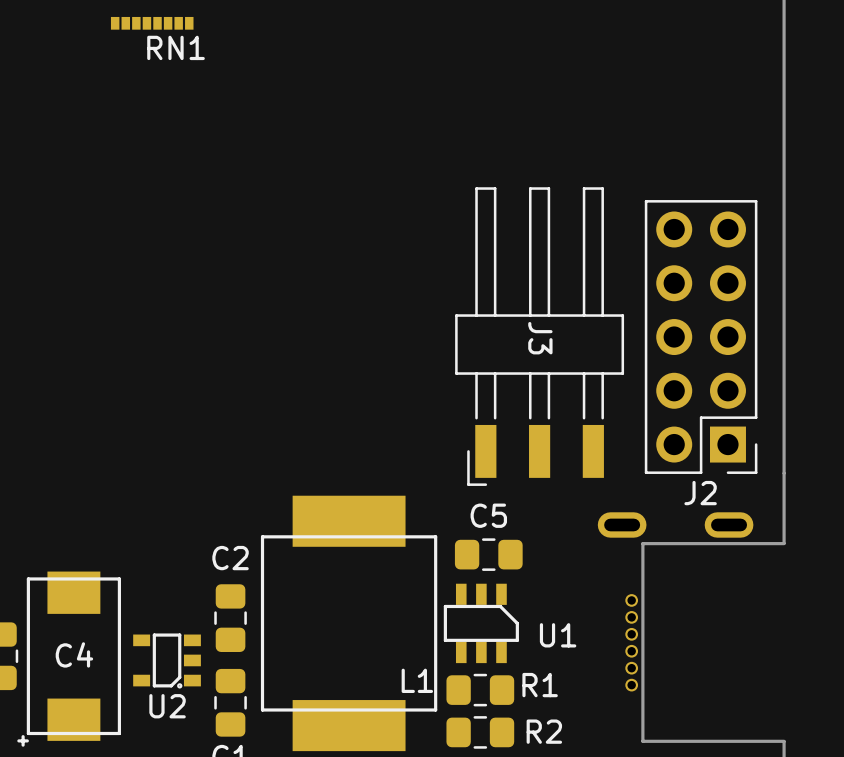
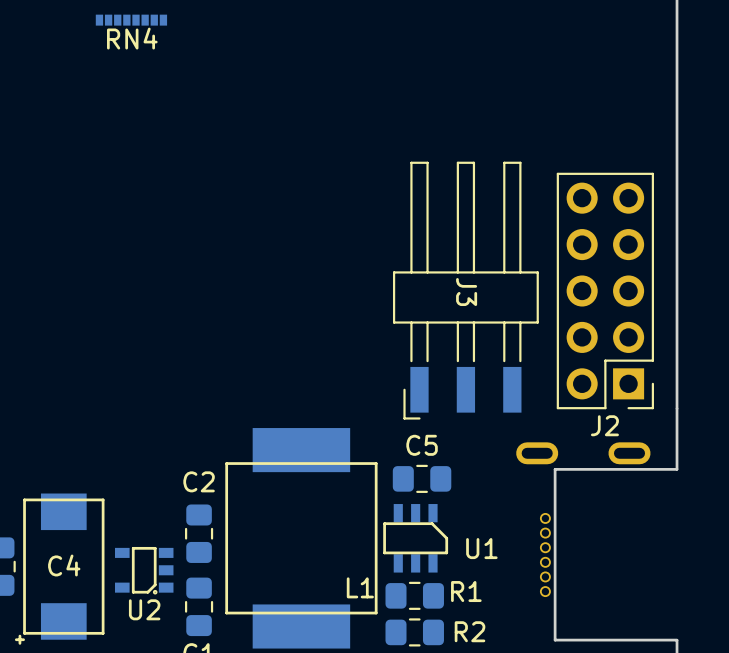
RN1 name: RN1 (176, 47) -> RN4 (132, 38)

